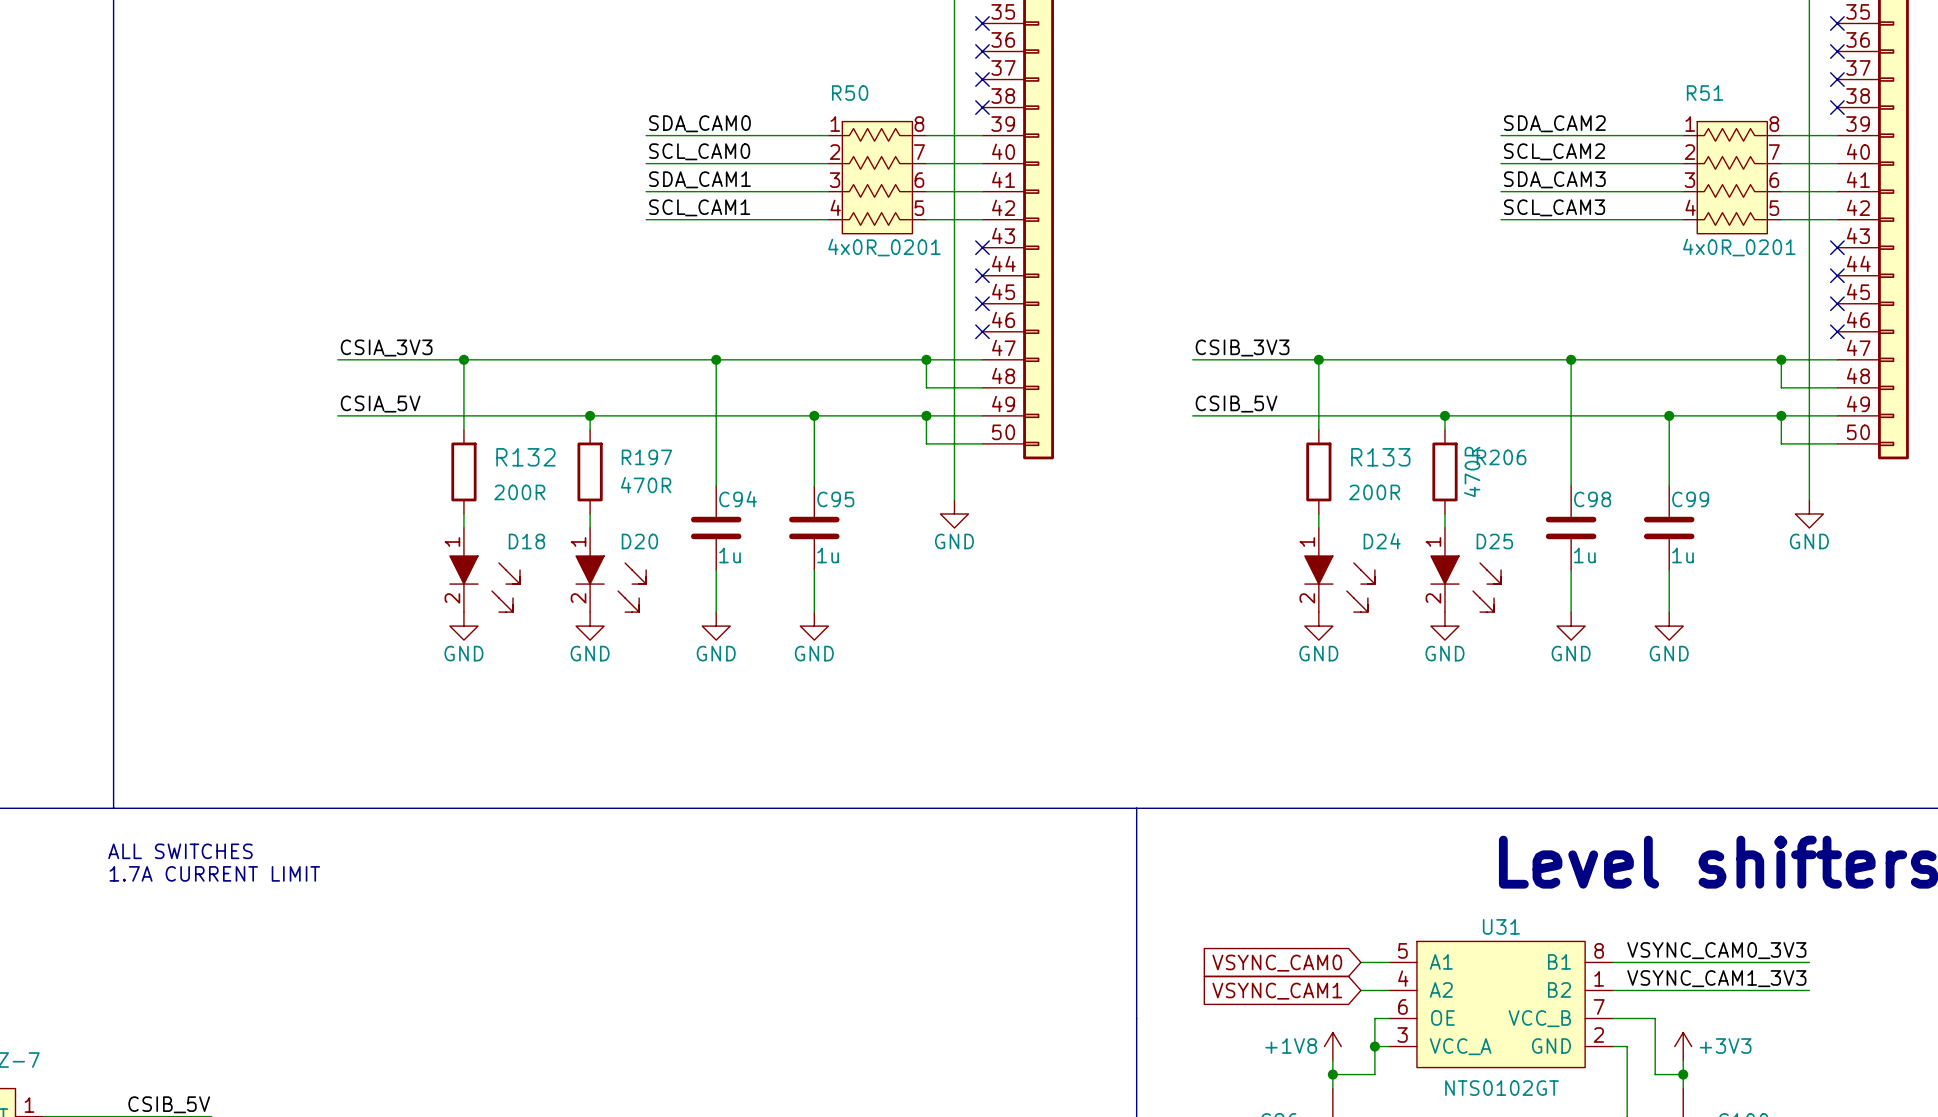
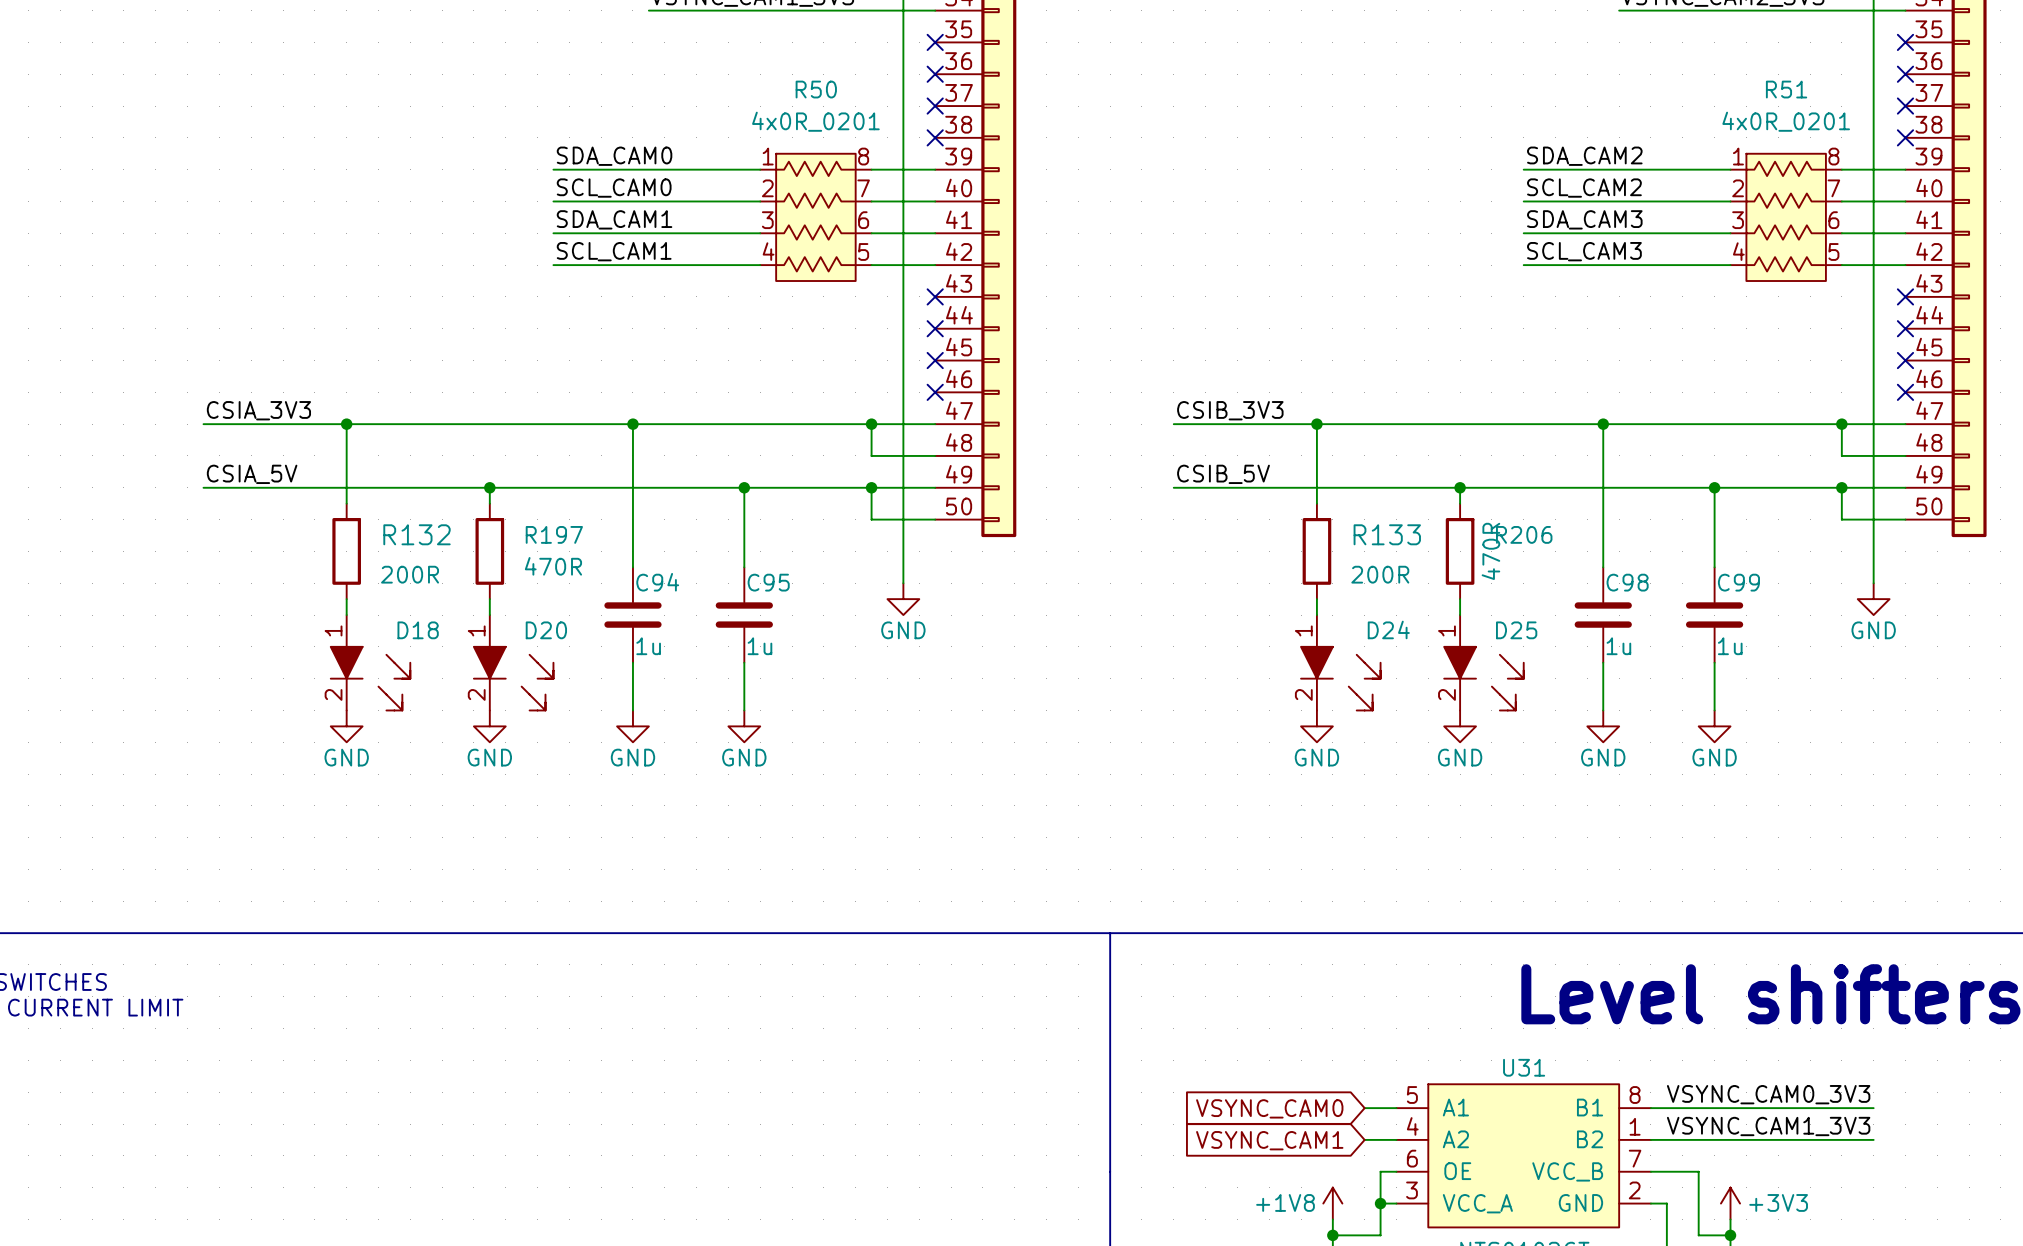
R50 name position: R50 (850, 93) -> R50 (816, 89)
R51 name position: R51 (1705, 93) -> R51 (1786, 89)
R50 text position: 4x0R_0201 (884, 247) -> 4x0R_0201 (815, 121)
R51 text position: 4x0R_0201 (1739, 247) -> 4x0R_0201 (1786, 121)

